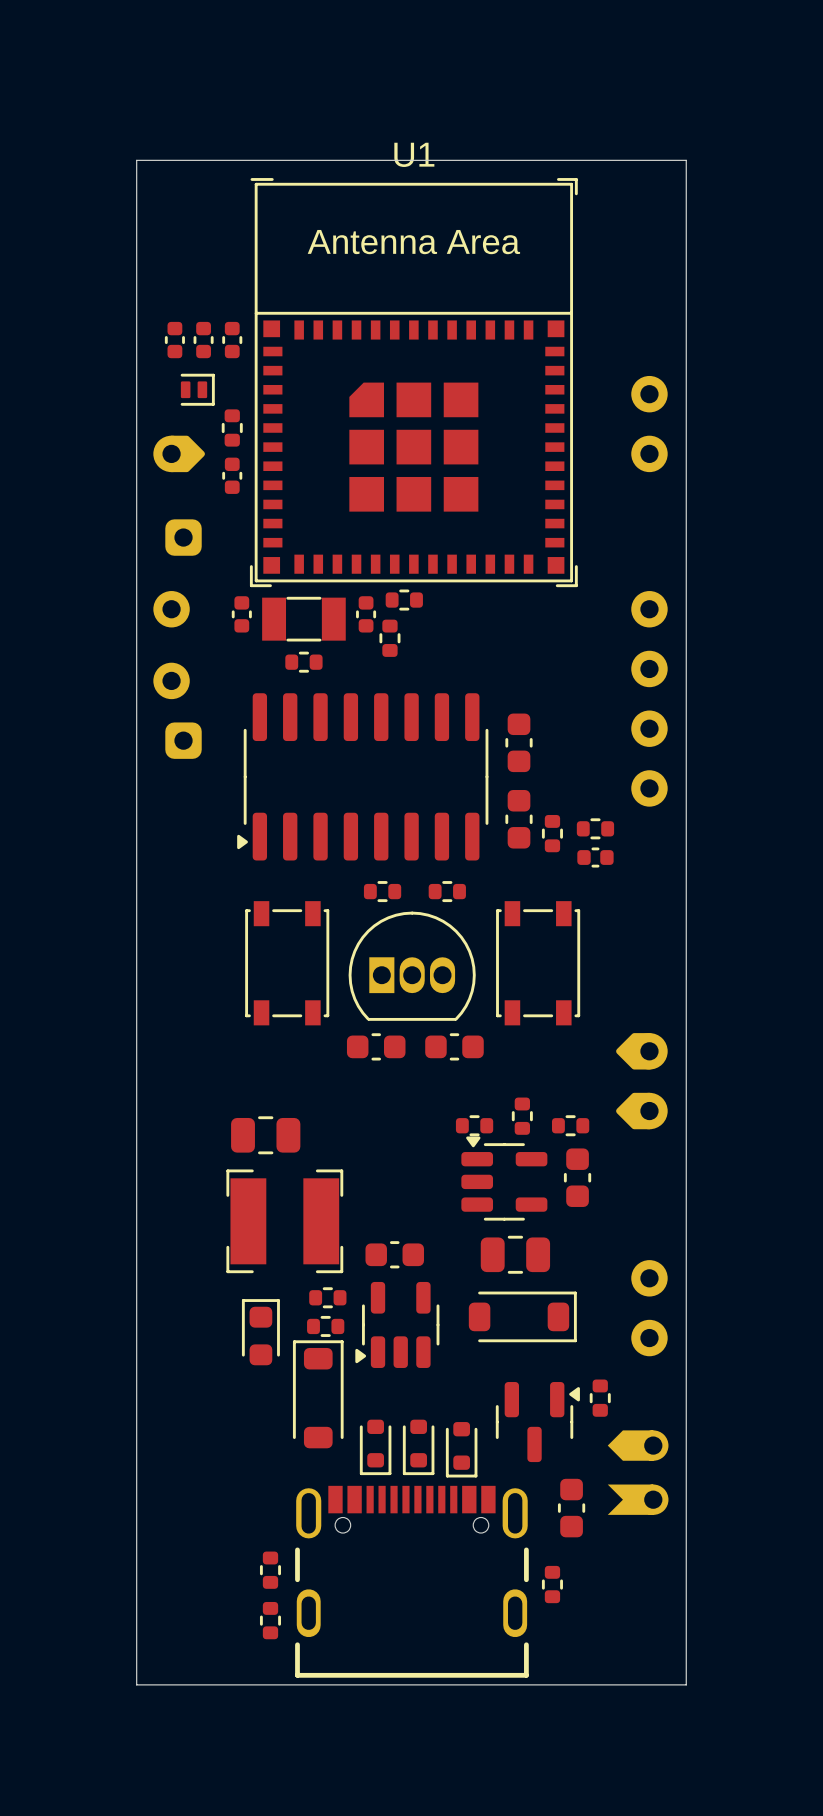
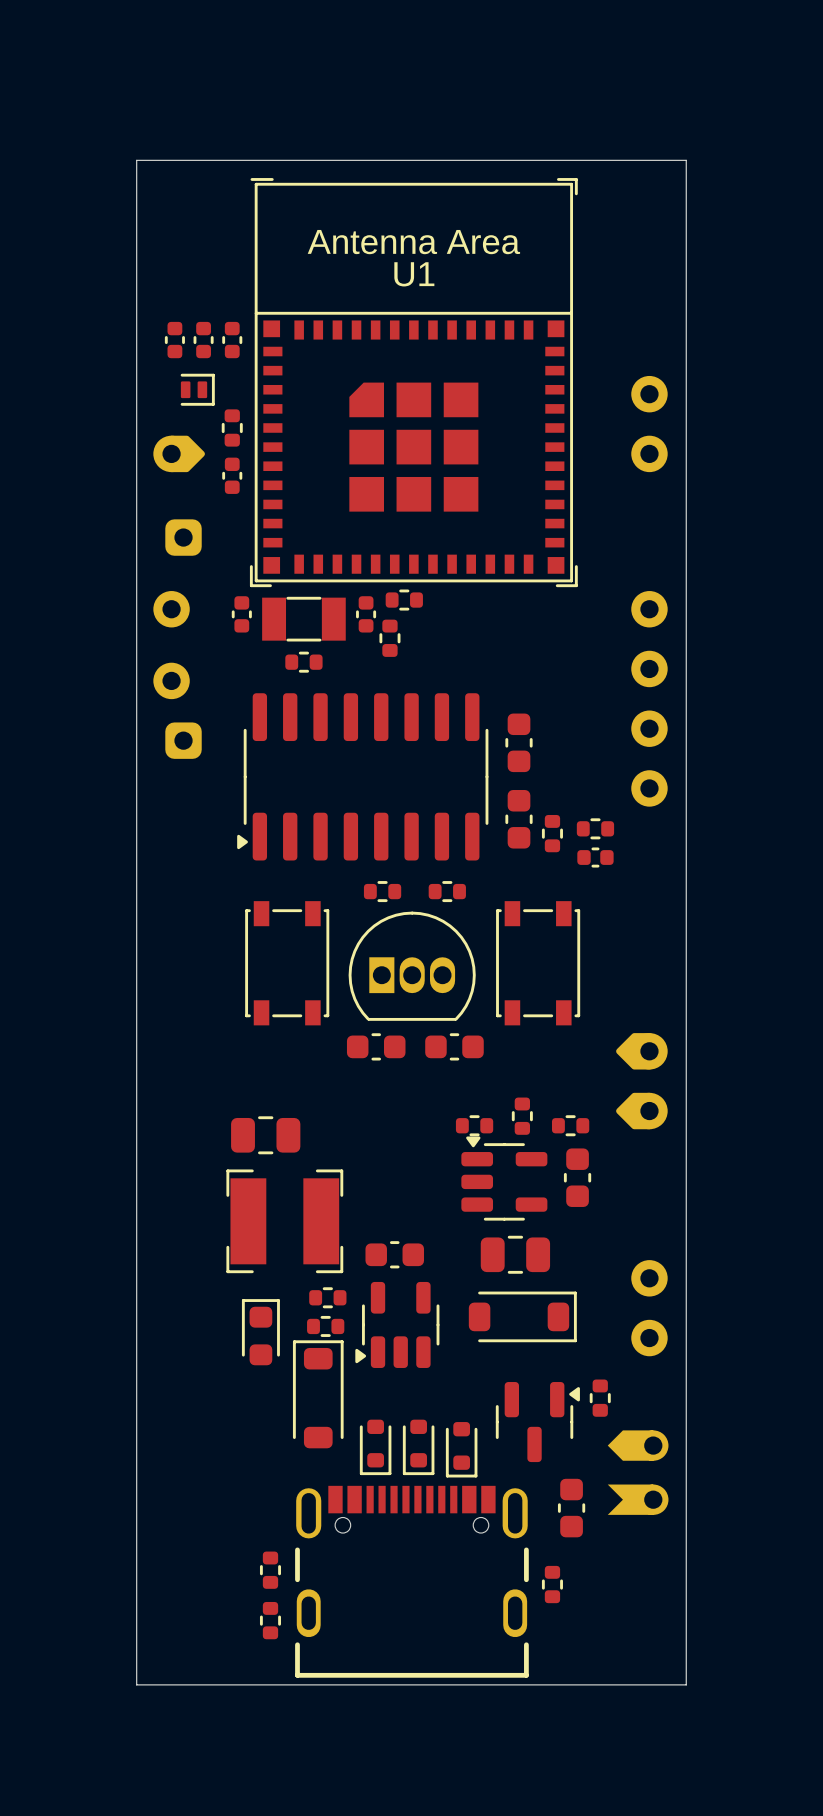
U1 name position: U1 (414, 154) -> U1 (414, 274)

